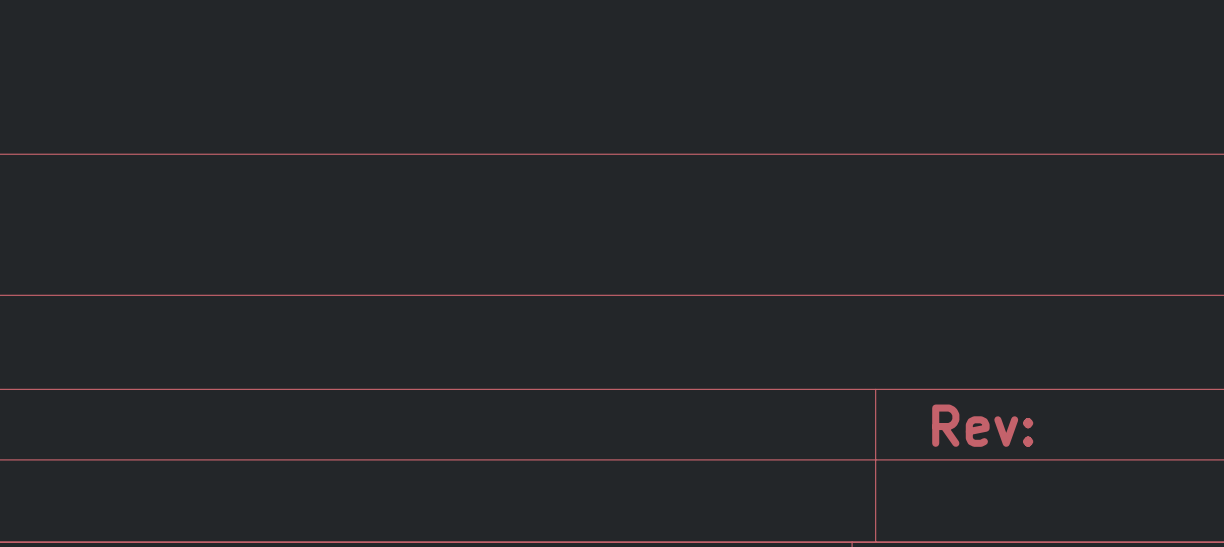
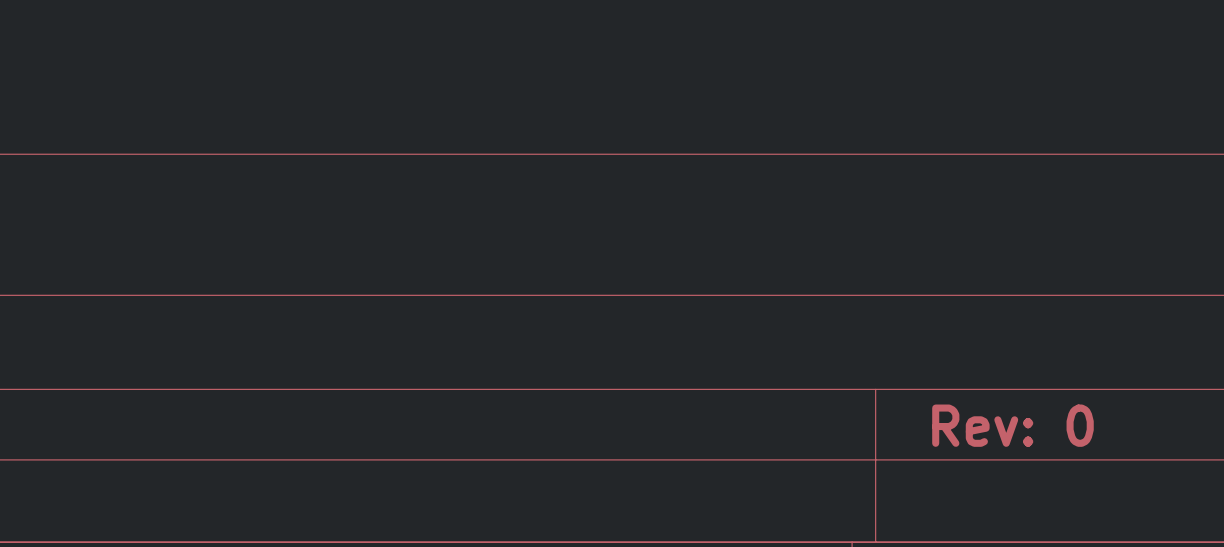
title block: Rev: (982, 425) -> Rev: 0 (1012, 425)

